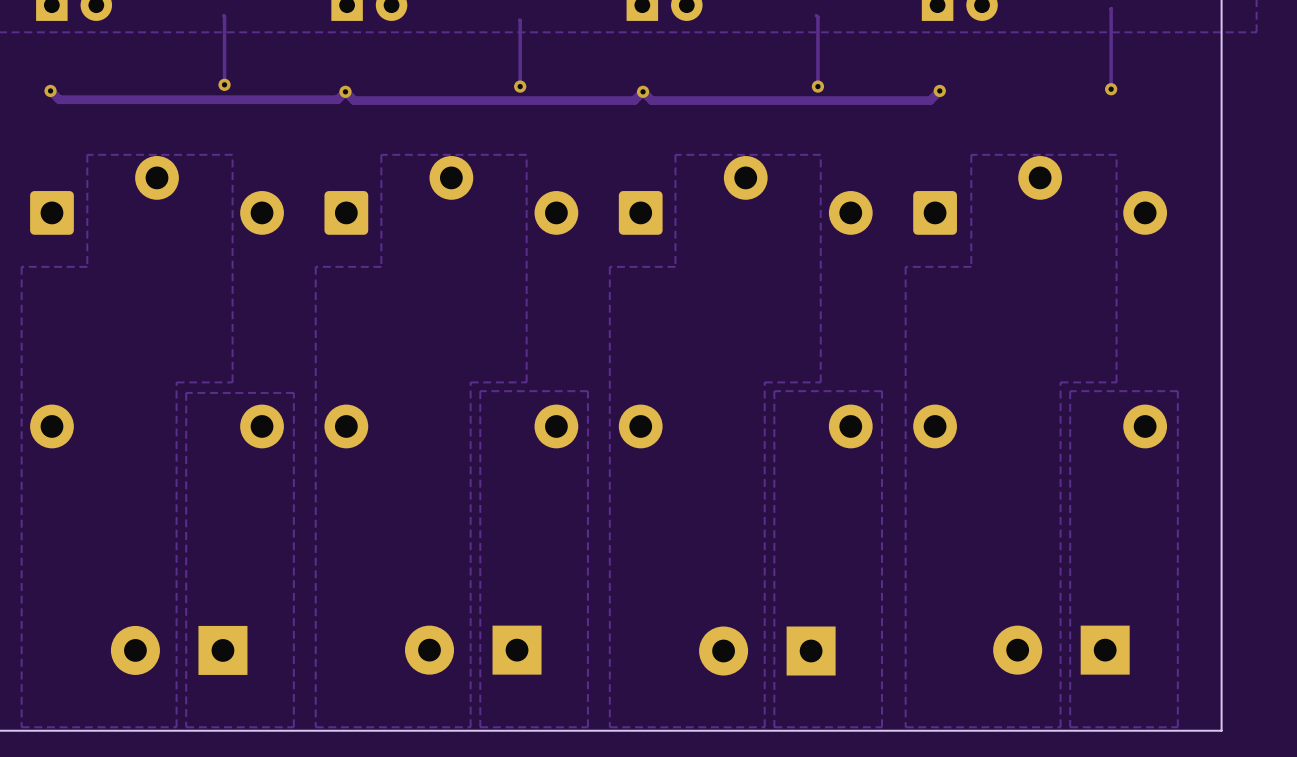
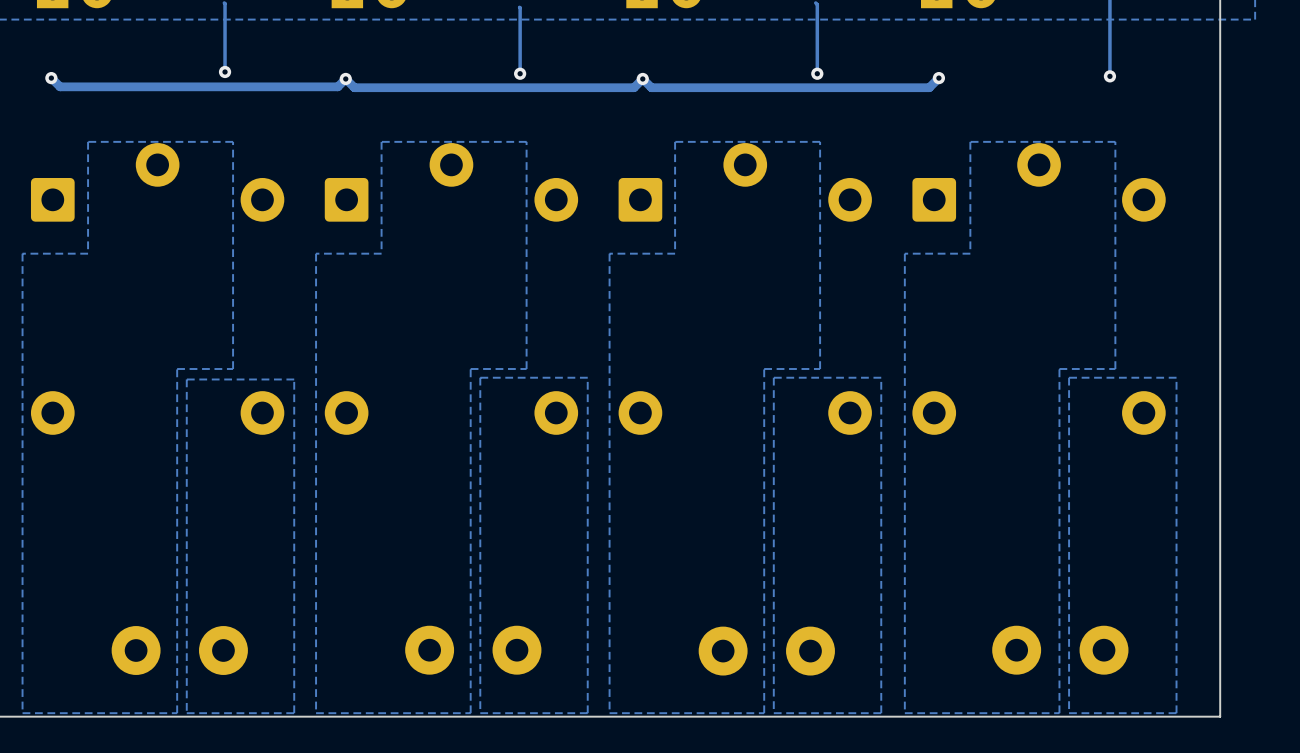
part footprint: [110, 625, 248, 675] -> [111, 626, 248, 675]
part footprint: [405, 625, 542, 675] -> [405, 625, 542, 675]
part footprint: [993, 625, 1130, 675] -> [992, 625, 1129, 675]
part footprint: [699, 626, 836, 676] -> [698, 626, 835, 676]

